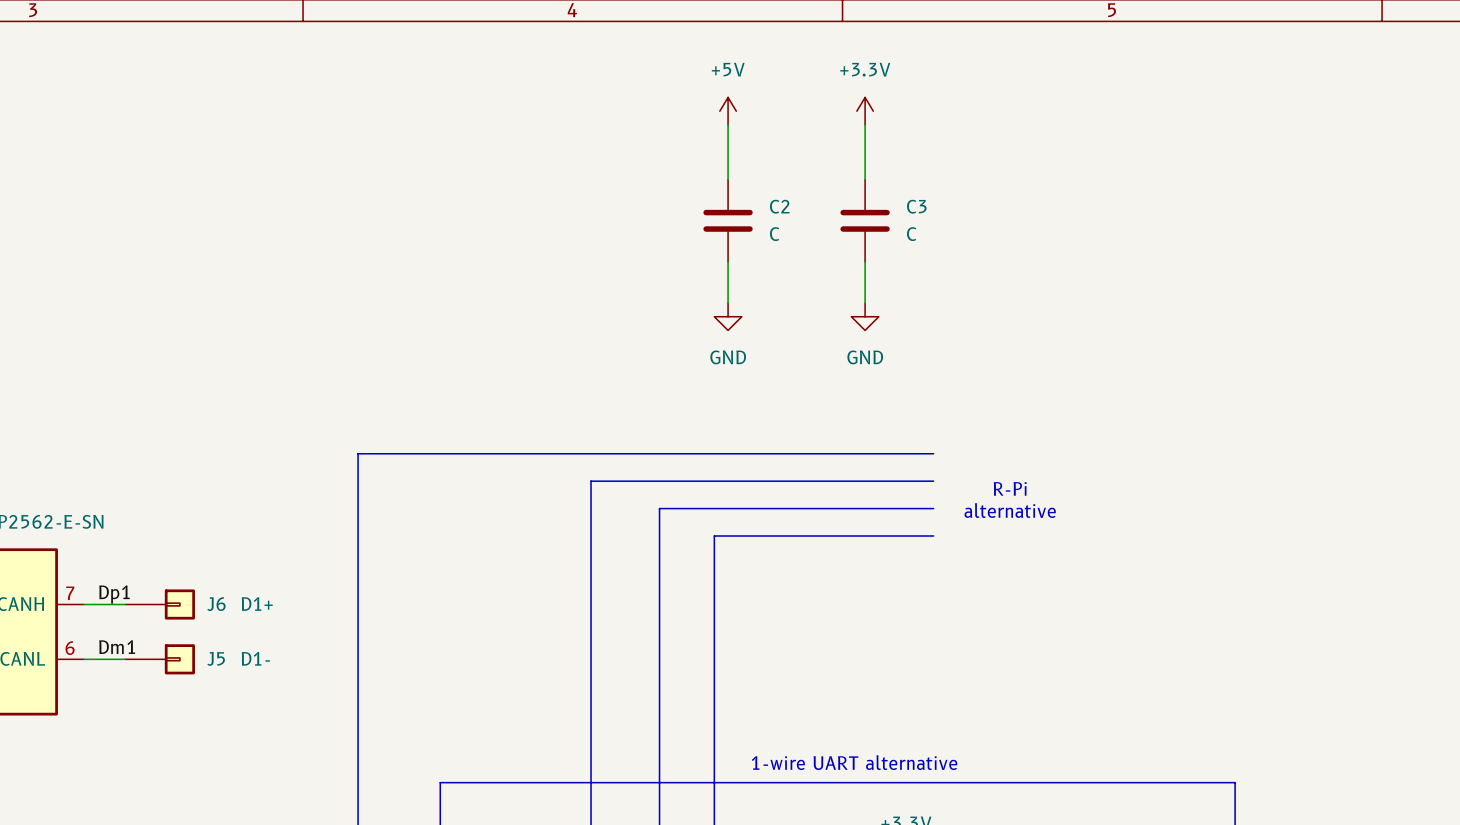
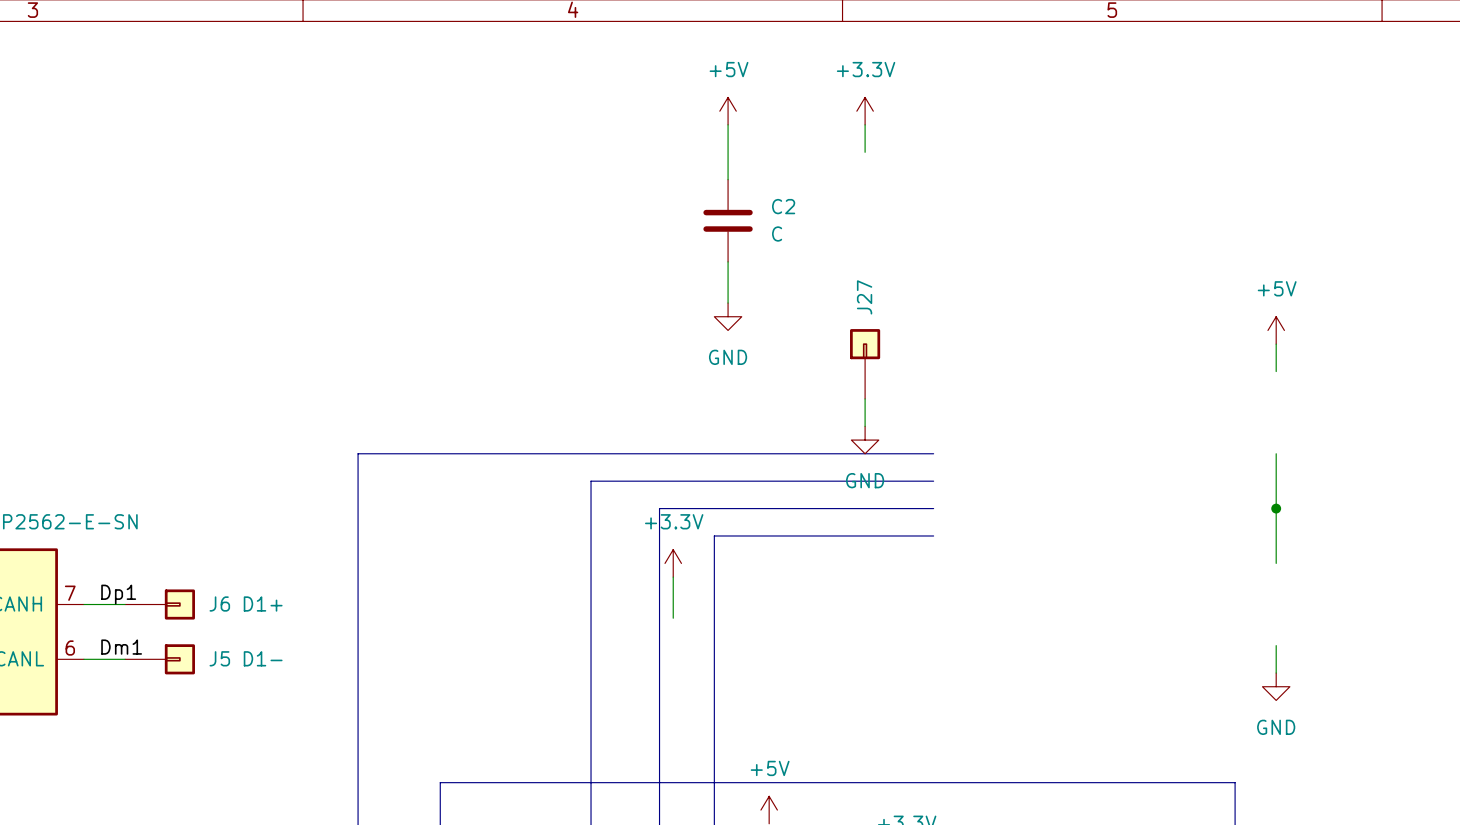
wire: (865, 152) (865, 179) -> (865, 398) (865, 426)
C3: C (865, 220) -> none
wire: (865, 261) (865, 303) -> none
power symbol position: GND (865, 316) -> GND (865, 440)
power symbol: none -> +5V (1276, 330)
wire: none -> (1276, 344) (1276, 371)
J27: none -> (865, 364)
wire: none -> (1276, 453) (1276, 563)
text: R-Pi (1010, 488) -> none
junction: none -> (1276, 508)
text: alternative (1010, 510) -> none
power symbol: none -> +3.3V (673, 563)
wire: none -> (673, 577) (673, 618)
wire: none -> (1276, 645) (1276, 673)
power symbol: none -> GND (1276, 686)
text: 1-wire UART alternative (854, 762) -> none
power symbol: none -> +5V (769, 810)

